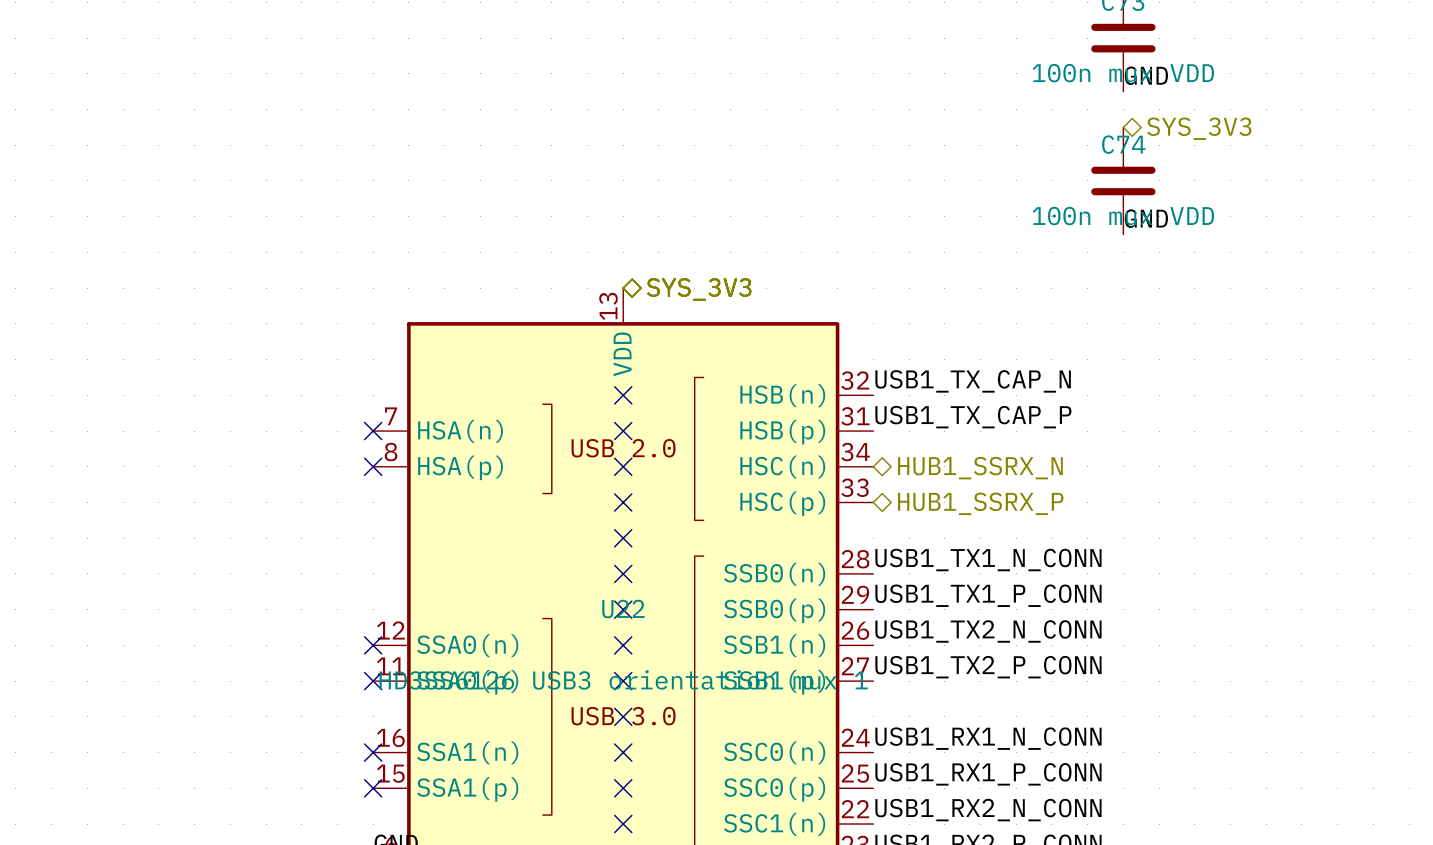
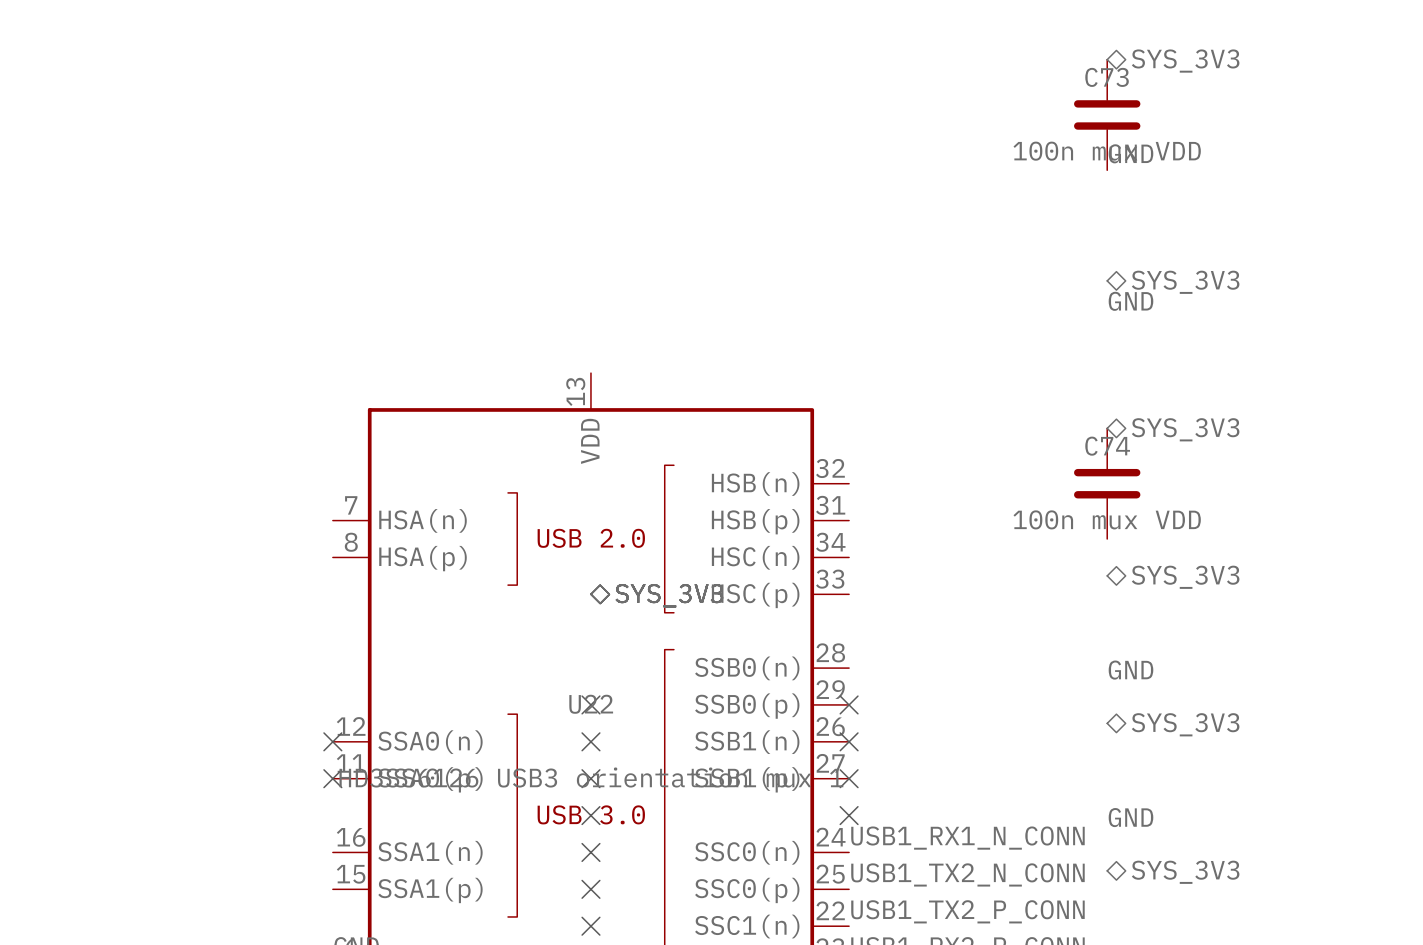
hierarchical label position: SYS_3V3 (1199, 128) -> SYS_3V3 (1185, 282)
C74 position: (1123, 180) -> (1107, 483)
hierarchical label position: SYS_3V3 (699, 289) -> SYS_3V3 (669, 595)
hierarchical label: none -> SYS_3V3 (1185, 429)
label: USB1_TX_CAP_N (973, 381) -> none
no-connect mark: (623, 395) -> none
label: USB1_TX_CAP_P (973, 417) -> none
no-connect mark: (373, 431) -> none
no-connect mark: (623, 431) -> none
no-connect mark: (373, 466) -> none
no-connect mark: (623, 466) -> none
hierarchical label: HUB1_SSRX_N (980, 468) -> none
hierarchical label: none -> SYS_3V3 (1185, 577)
no-connect mark: (623, 502) -> none
hierarchical label: HUB1_SSRX_P (980, 503) -> none
no-connect mark: (623, 538) -> none
label: USB1_TX1_N_CONN (988, 560) -> none
no-connect mark: (623, 573) -> none
label: none -> GND (1130, 670)
label: USB1_TX1_P_CONN (988, 595) -> none
no-connect mark: none -> (849, 704)
hierarchical label: none -> SYS_3V3 (1185, 724)
label: USB1_TX2_N_CONN (988, 631) -> none
no-connect mark: none -> (849, 741)
label: USB1_TX2_P_CONN (988, 667) -> none
no-connect mark: none -> (849, 778)
no-connect mark: none -> (849, 815)
label: none -> GND (1130, 817)
no-connect mark: (373, 752) -> none
hierarchical label: none -> SYS_3V3 (1185, 872)
label: USB1_RX1_P_CONN (988, 774) -> USB1_TX2_N_CONN (967, 874)
no-connect mark: (373, 788) -> none
label: USB1_RX2_N_CONN (988, 810) -> USB1_TX2_P_CONN (967, 911)

